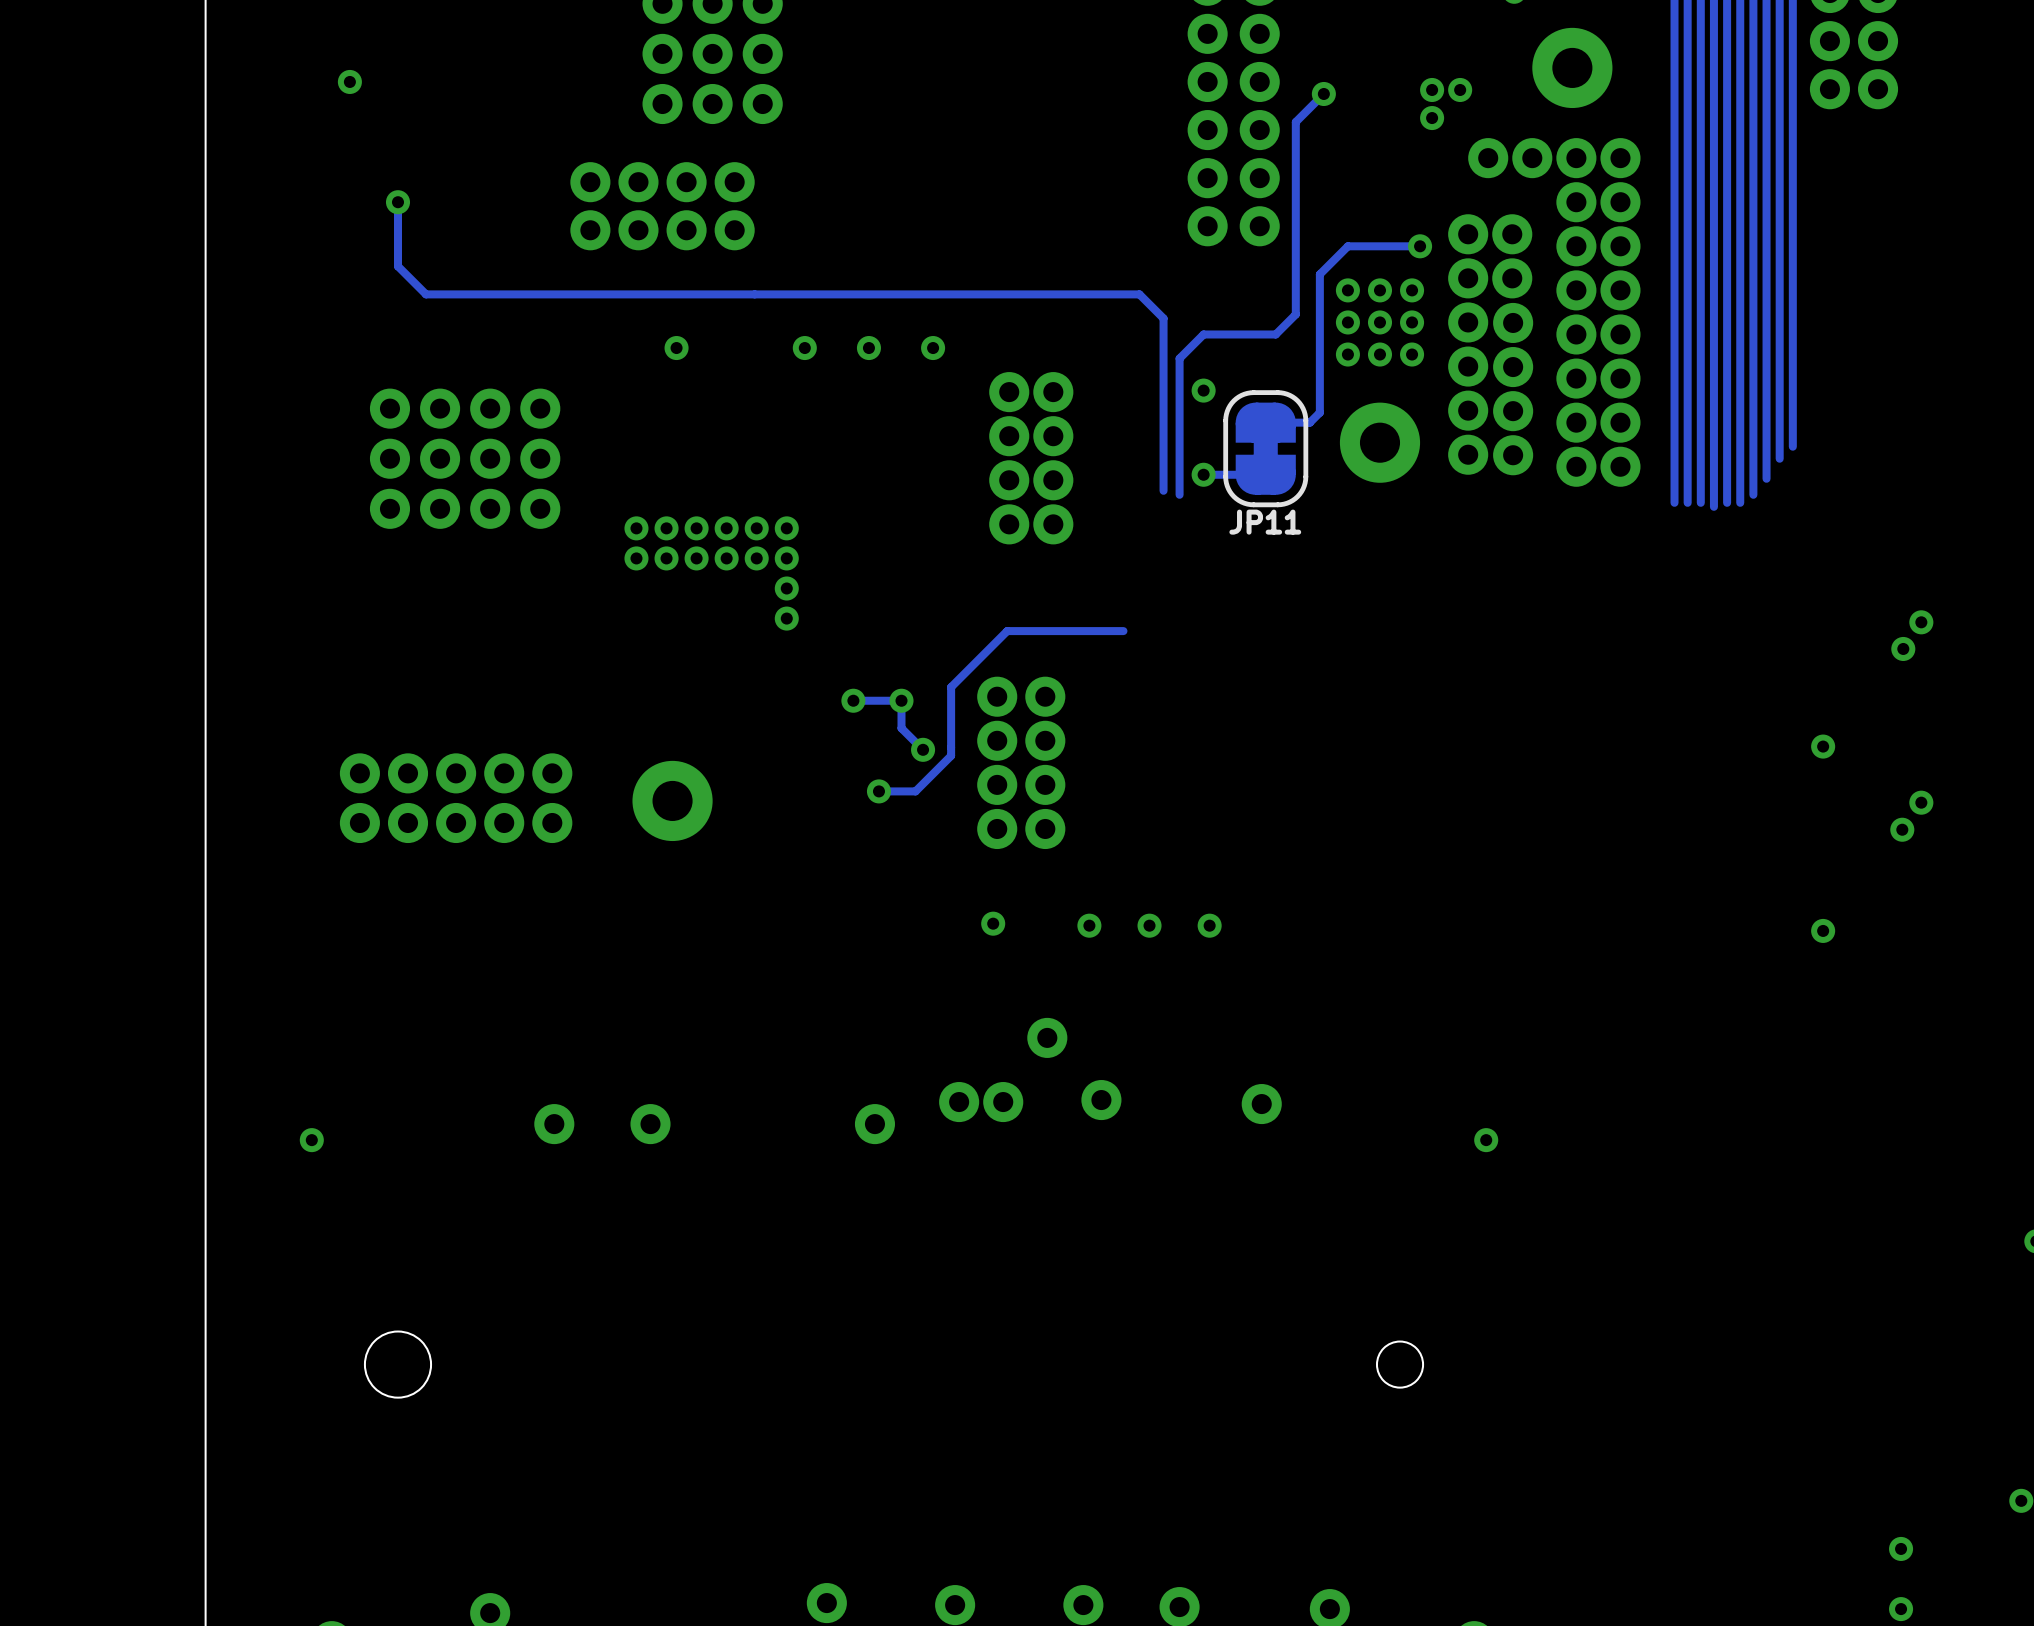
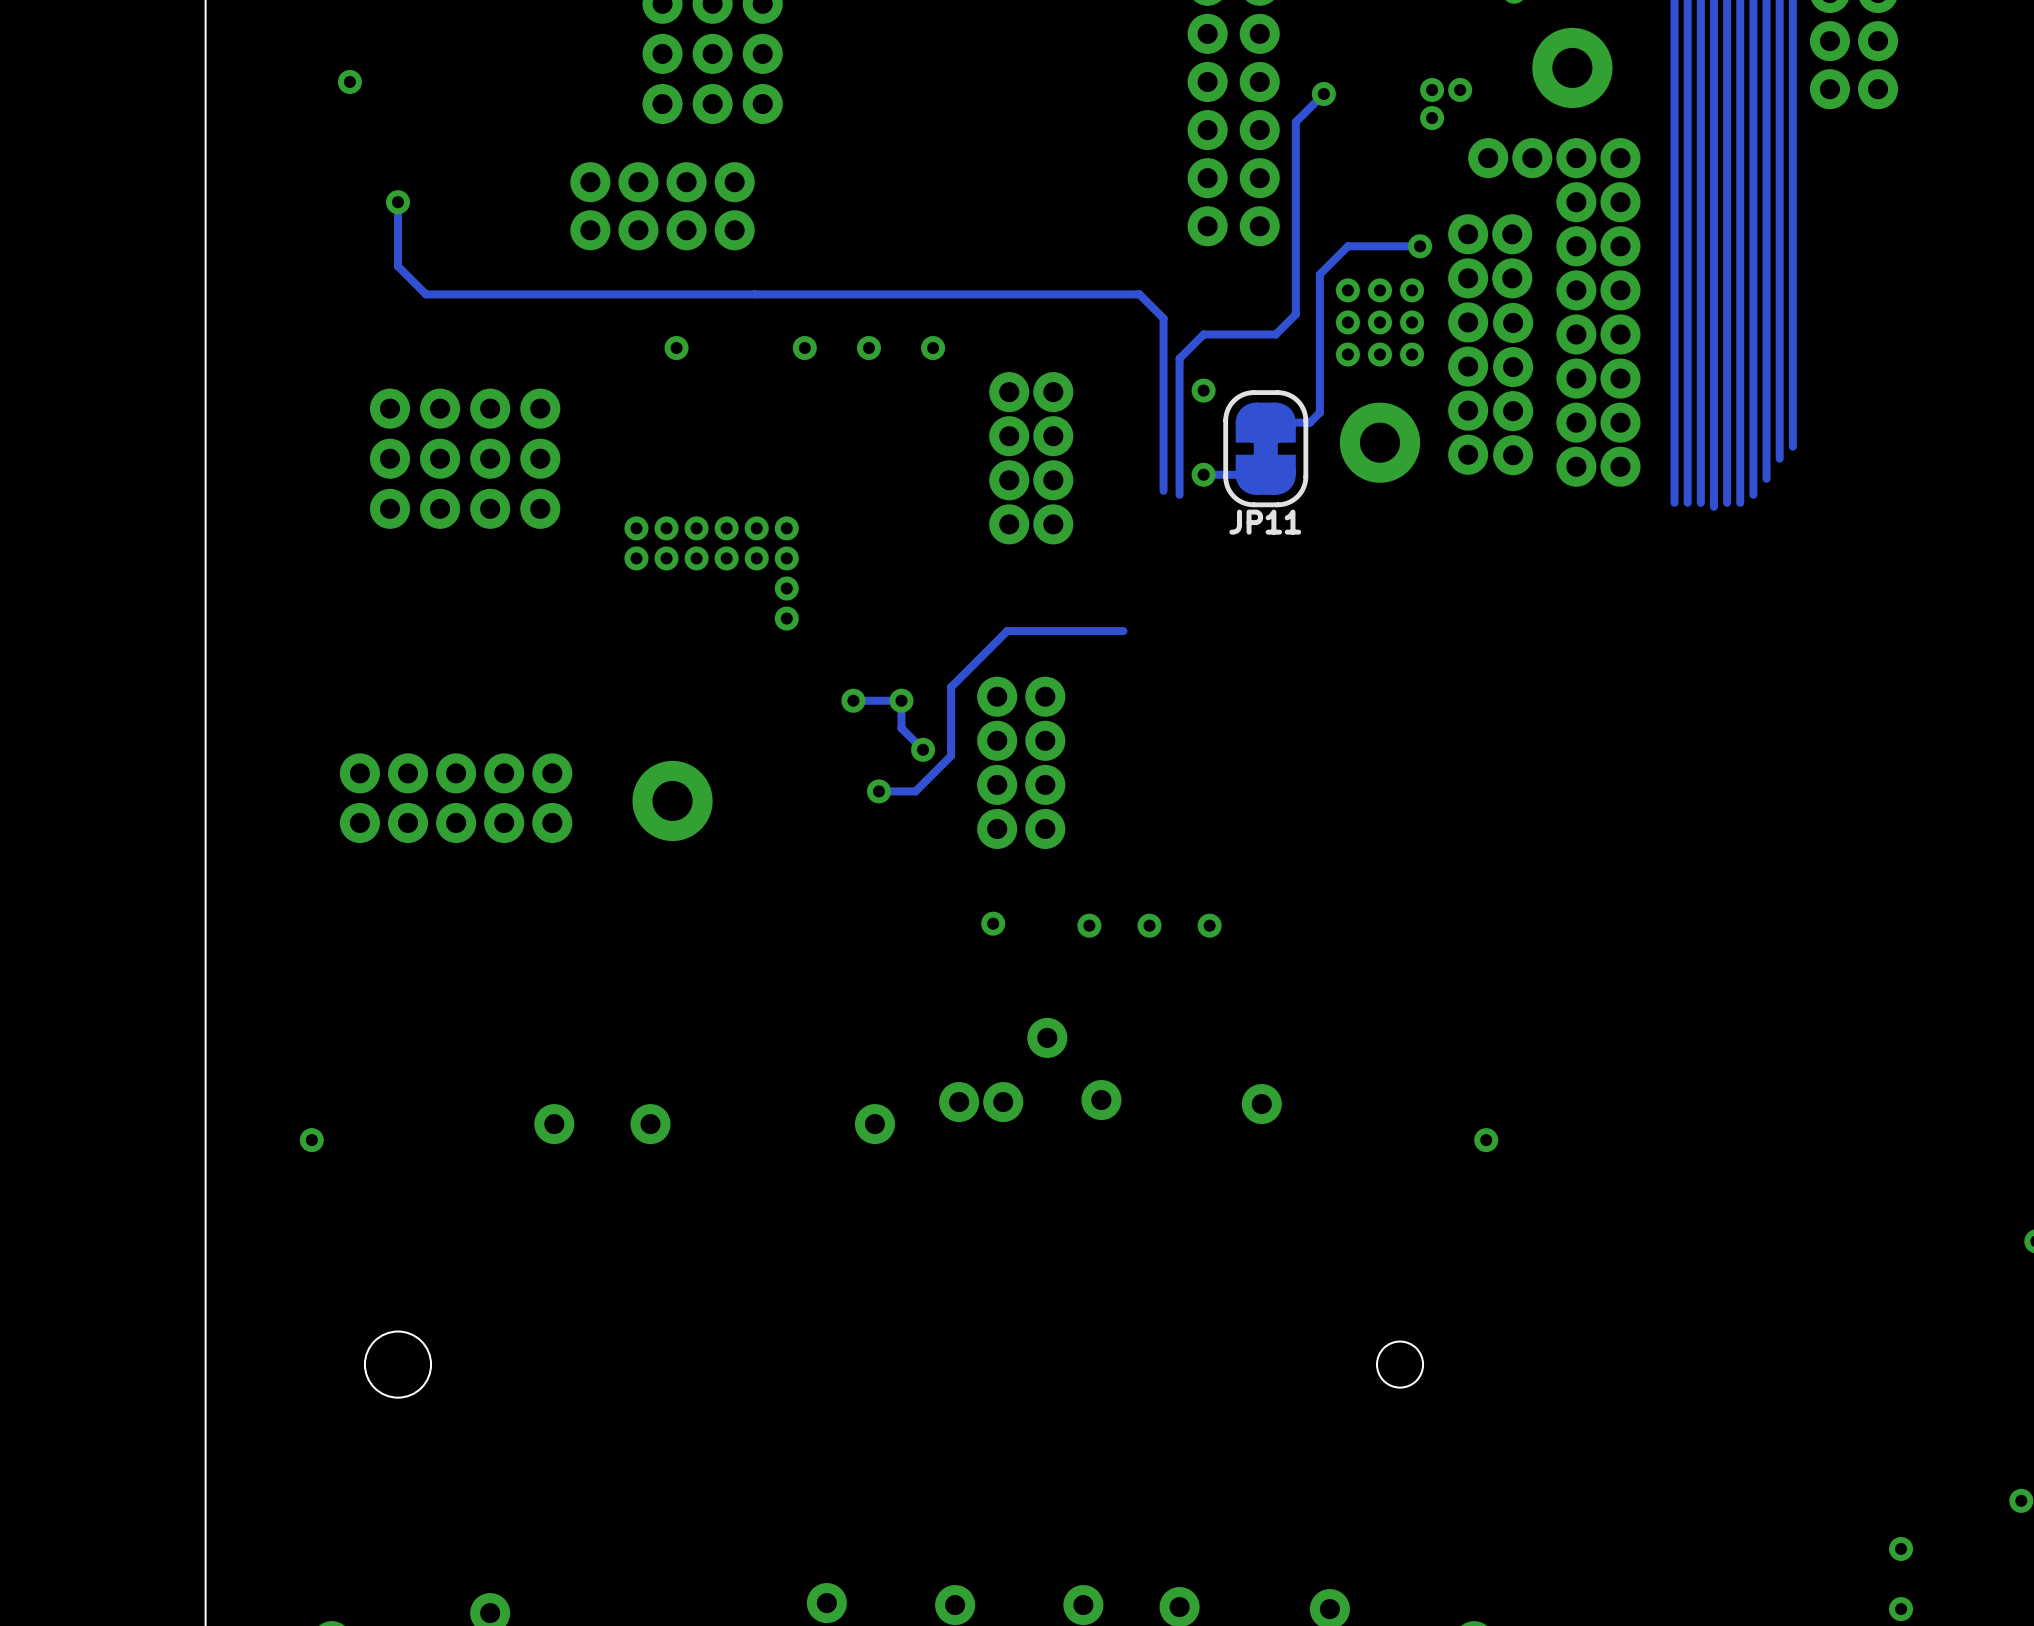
via: (1921, 622) -> none
via: (1903, 648) -> none
via: (1823, 746) -> none
via: (1921, 802) -> none
via: (1902, 829) -> none
via: (1823, 930) -> none

